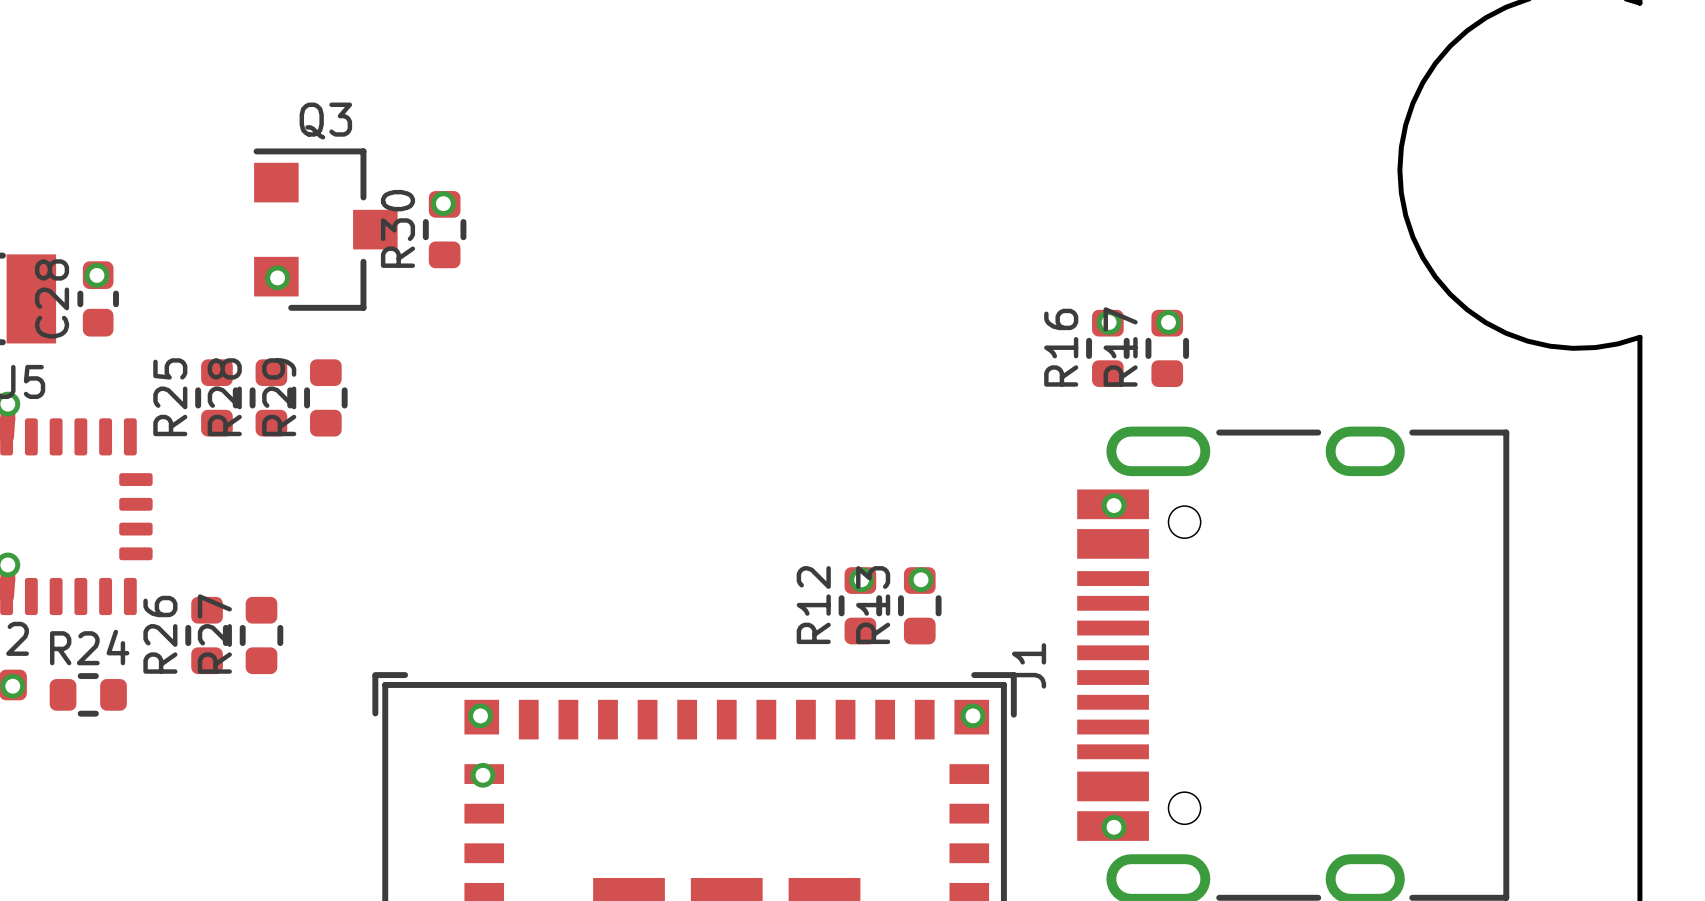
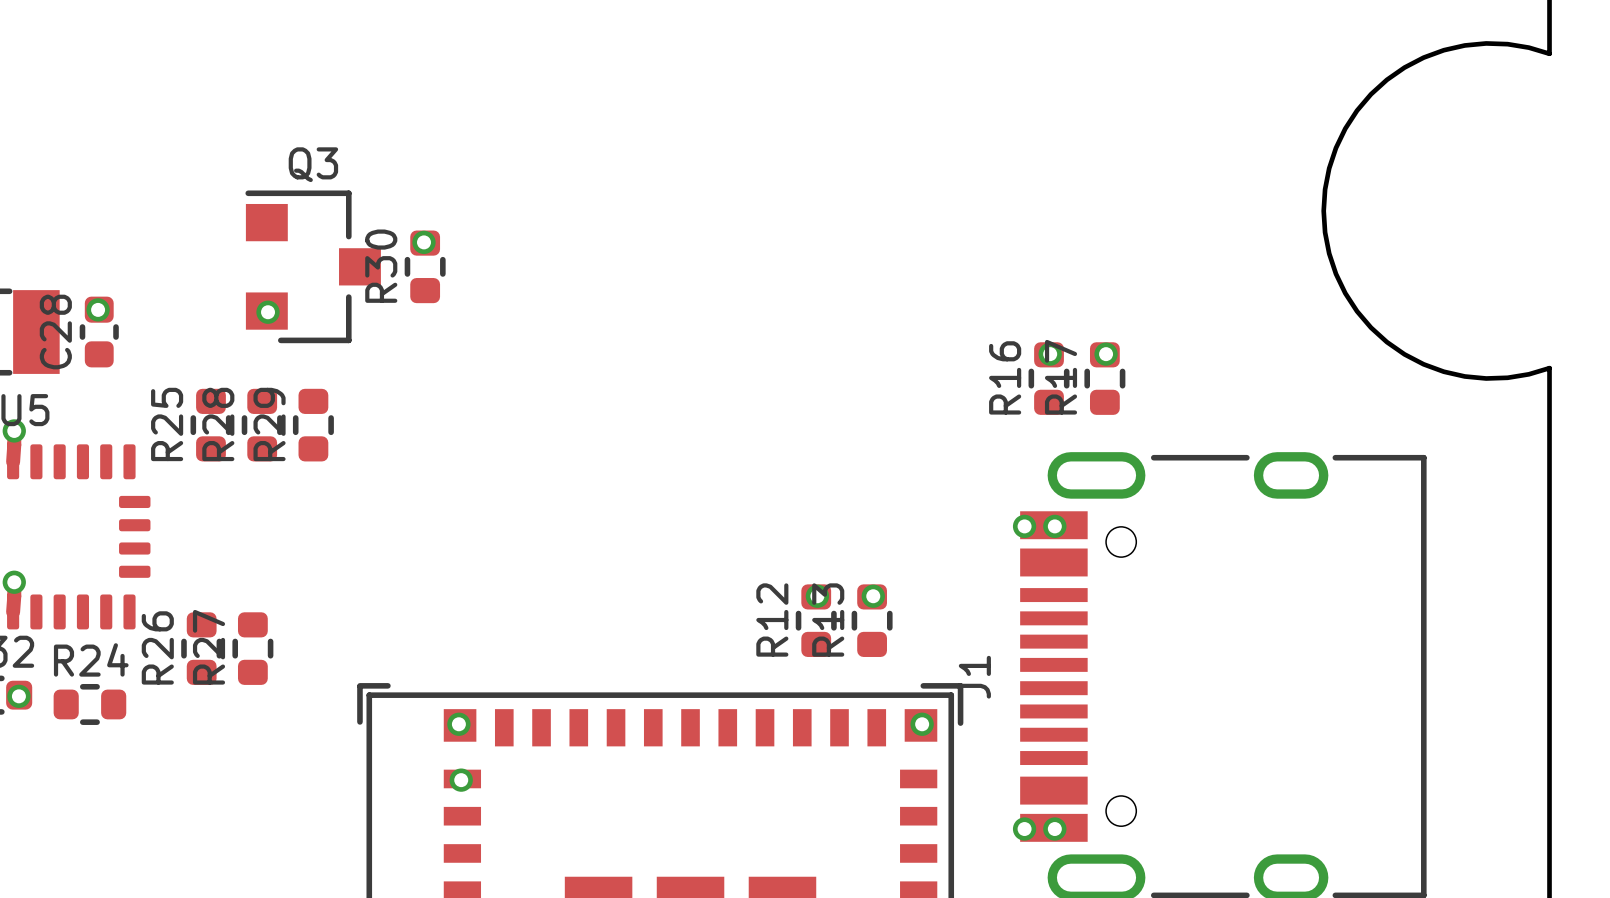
via: none -> (1024, 526)
via: none -> (1024, 829)

